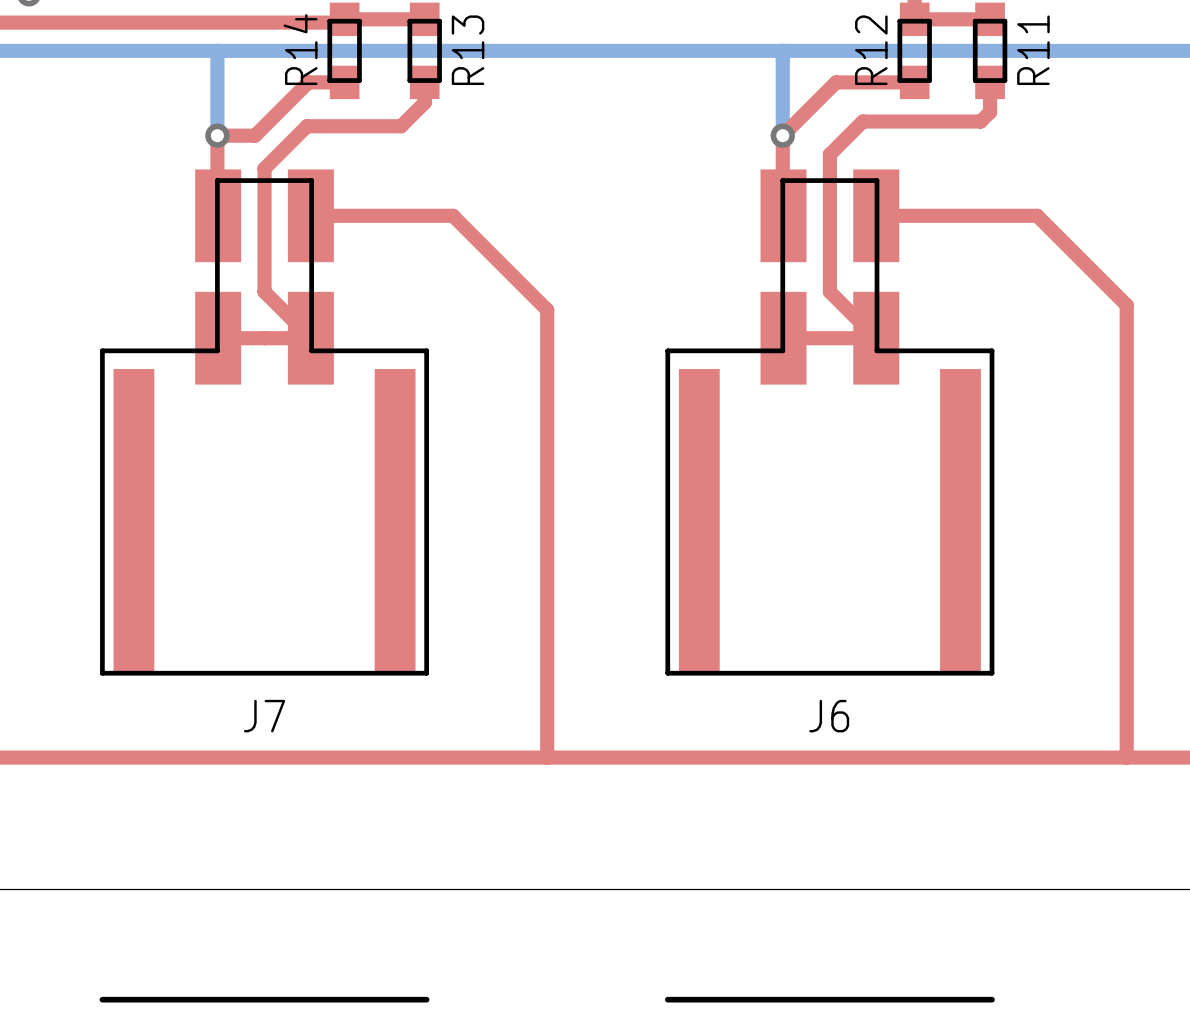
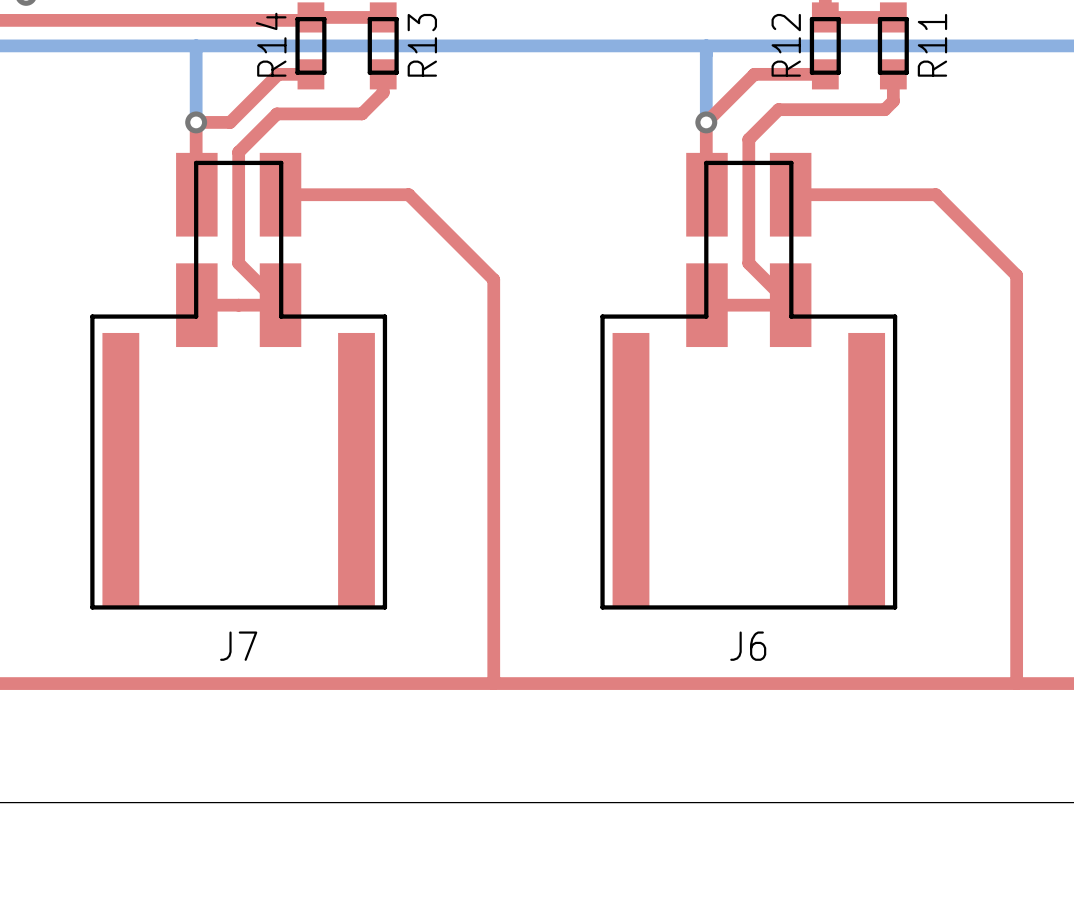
J7 footprint: [99, 169, 430, 1003] -> [90, 152, 388, 610]
J6 footprint: [664, 169, 995, 1003] -> [600, 152, 898, 610]

